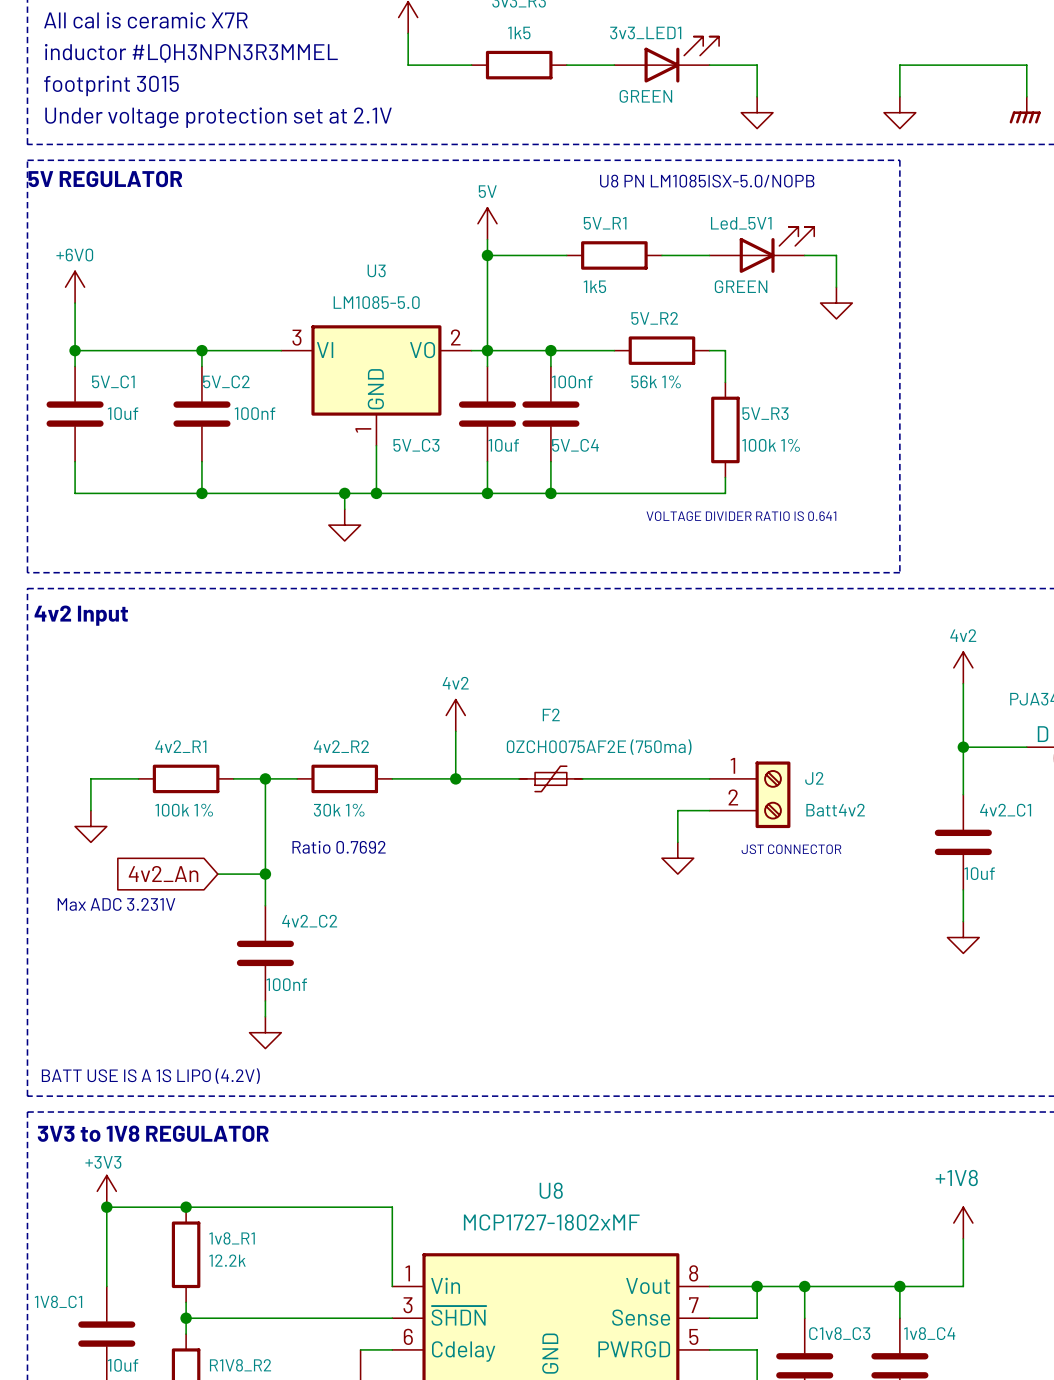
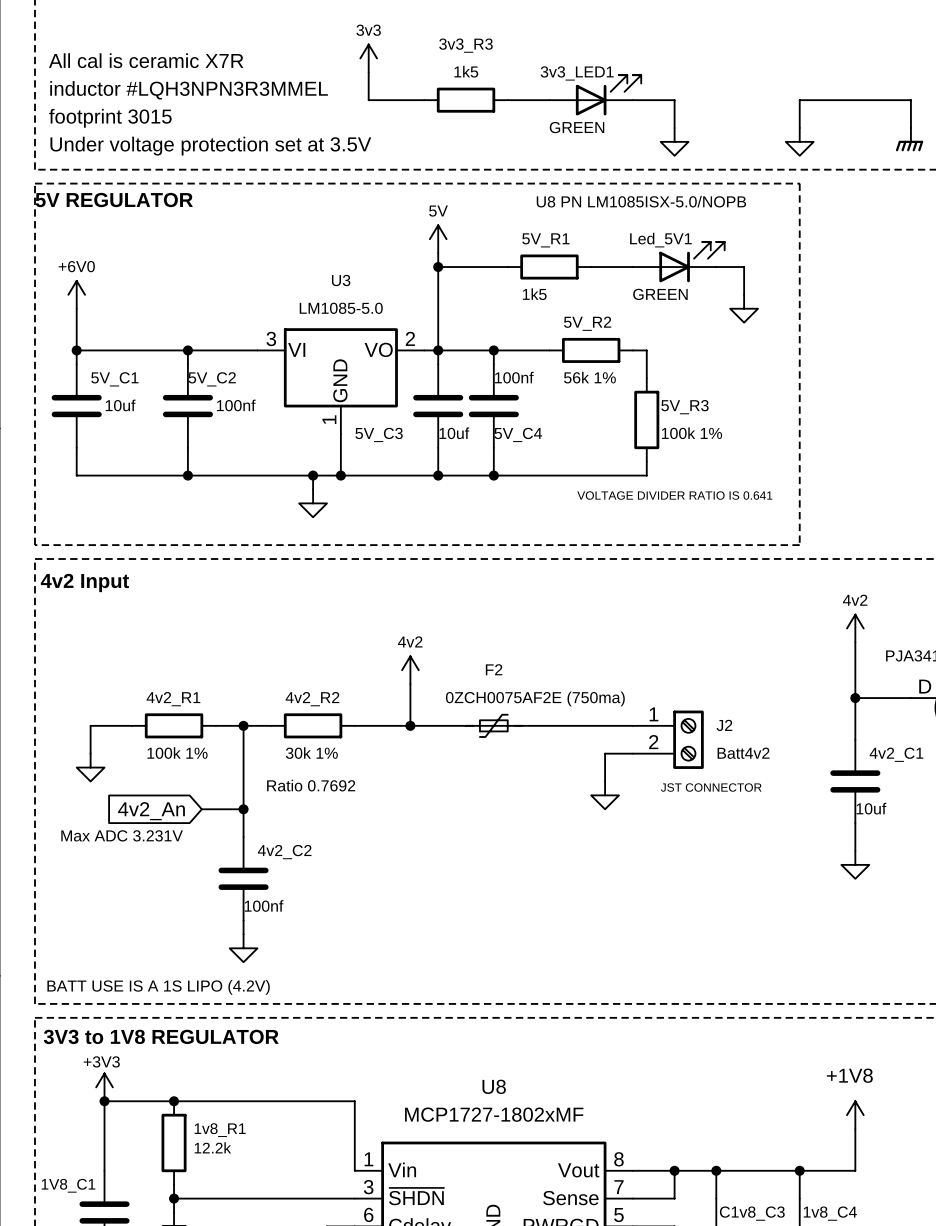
text: Under voltage protection set at 2.1V (218, 117) -> Under voltage protection set at 3.5V (210, 146)

